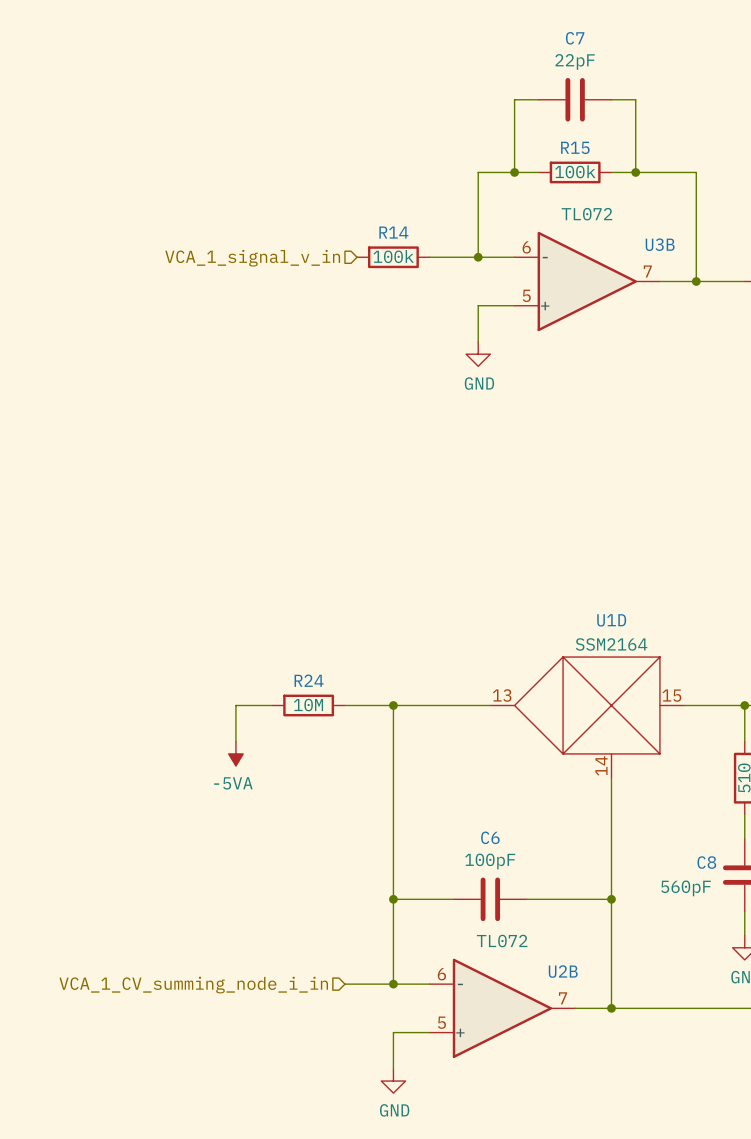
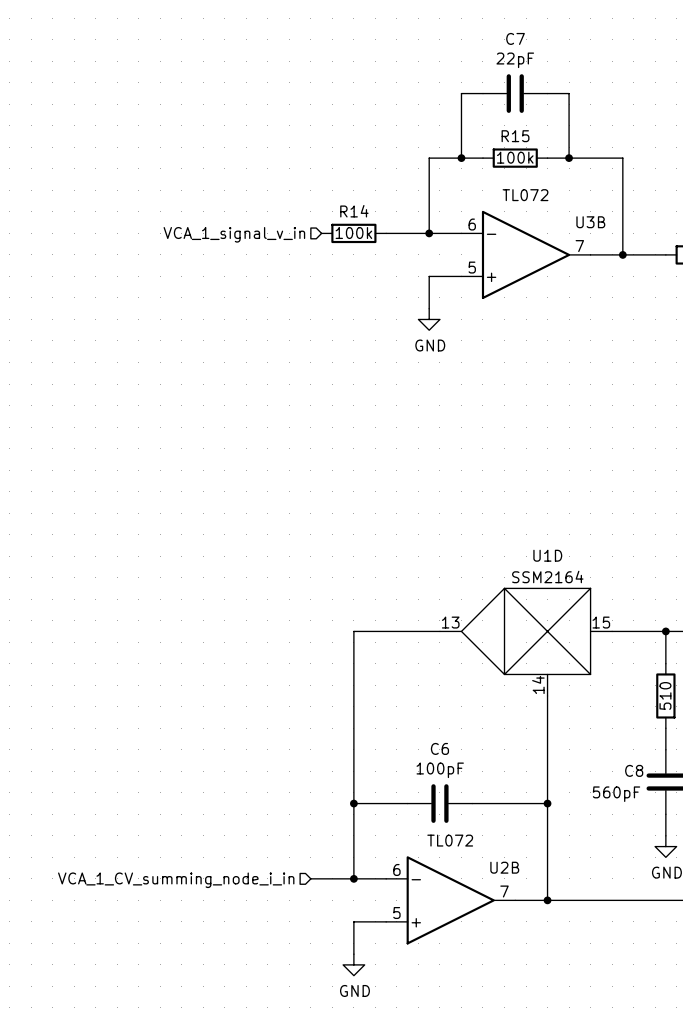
wire: (272, 705) (235, 705) (235, 741) -> none
R24: 10M (308, 705) -> none
wire: (344, 705) (393, 705) -> none
junction: (393, 705) -> none
power symbol: -5VA (235, 753) -> none

